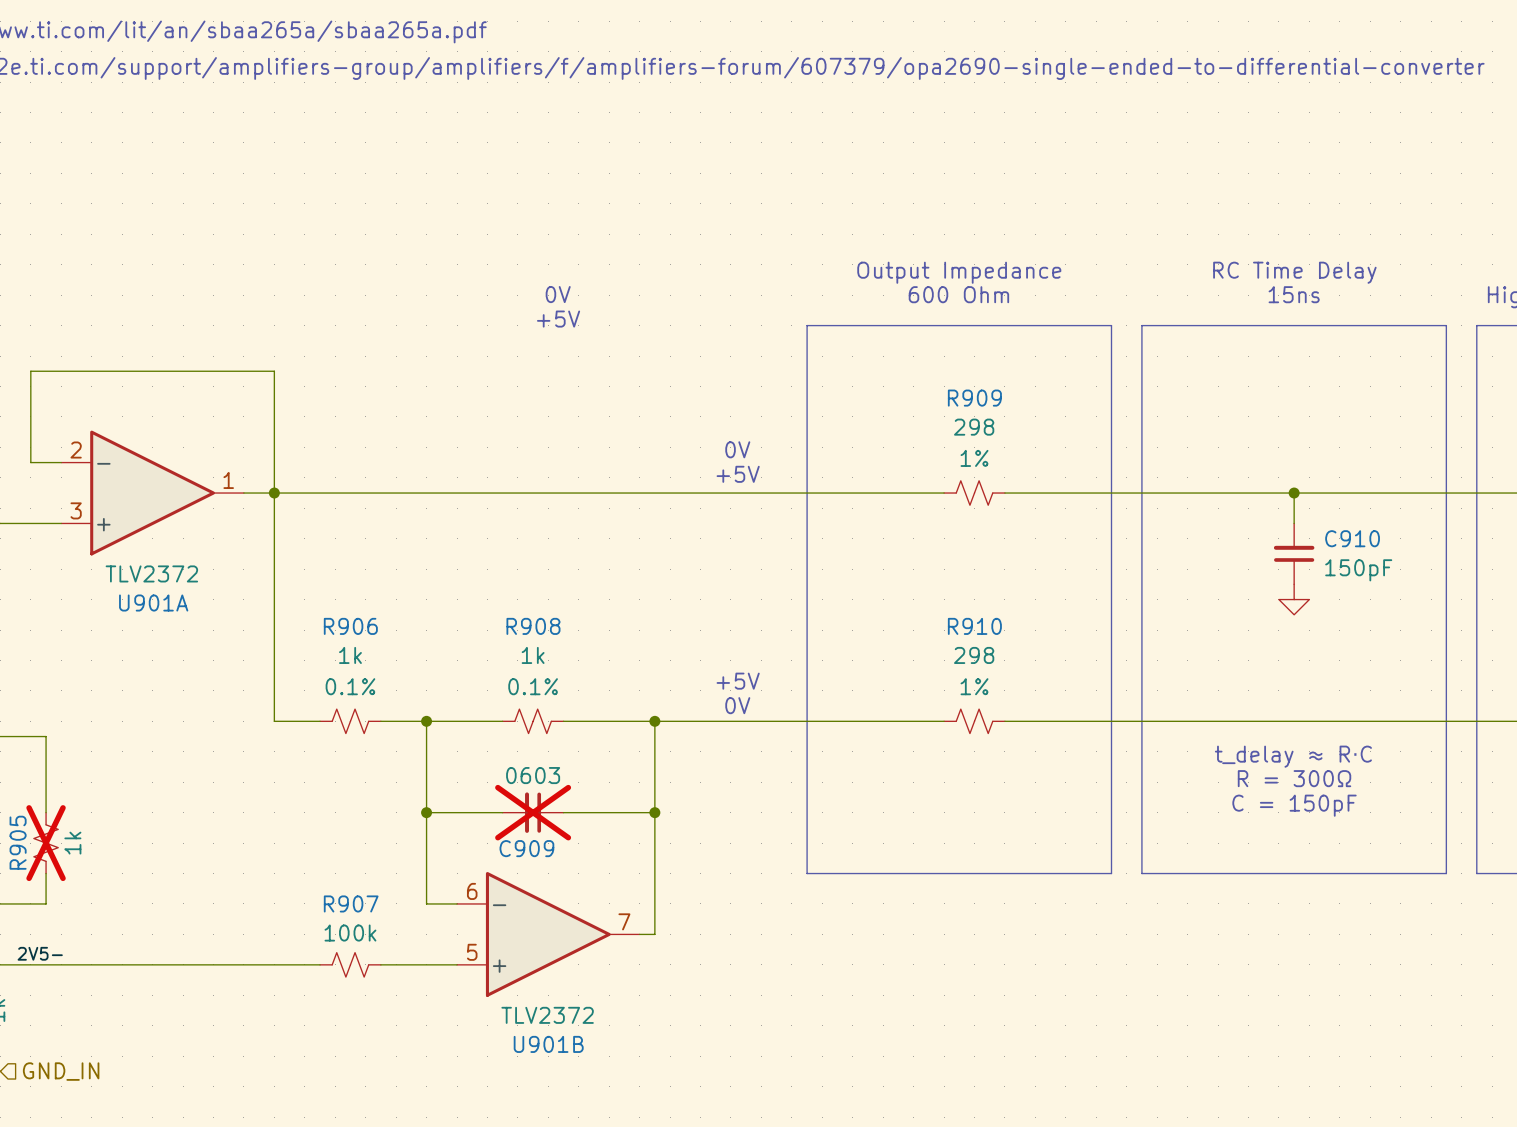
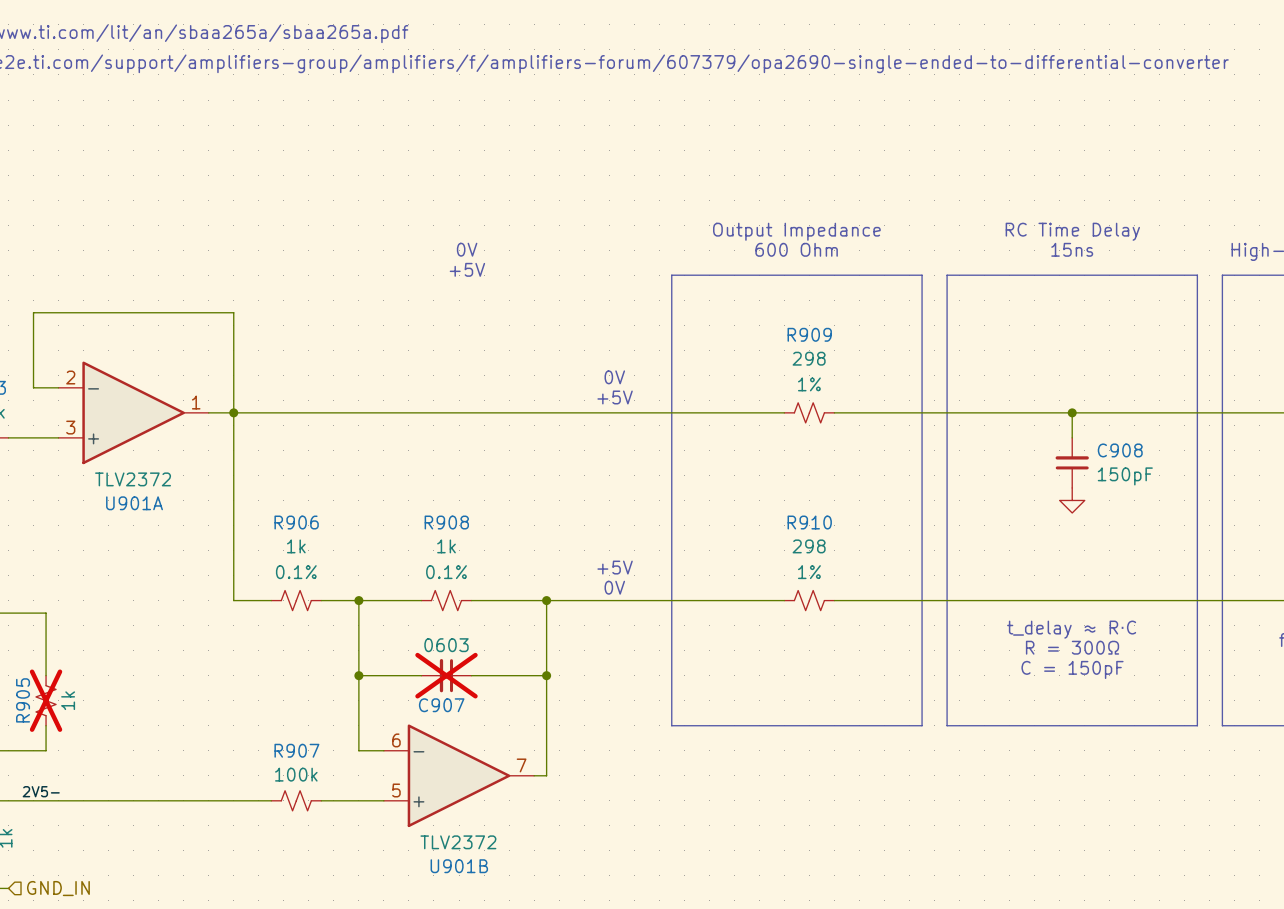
C910 name: C910 (1352, 538) -> C908 (1120, 450)
C909 name: C909 (526, 848) -> C907 (441, 705)

